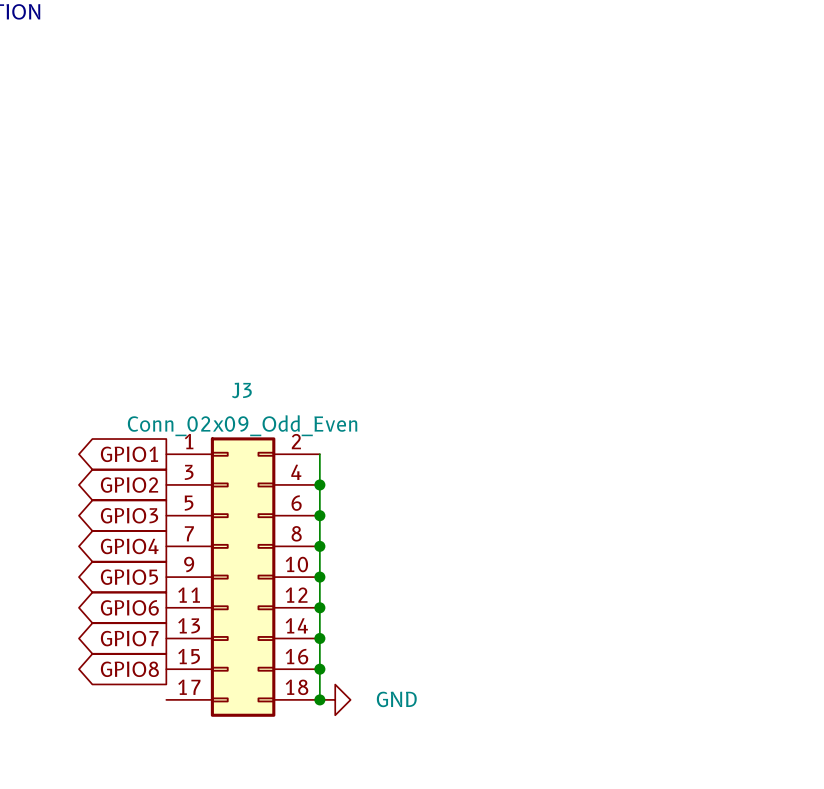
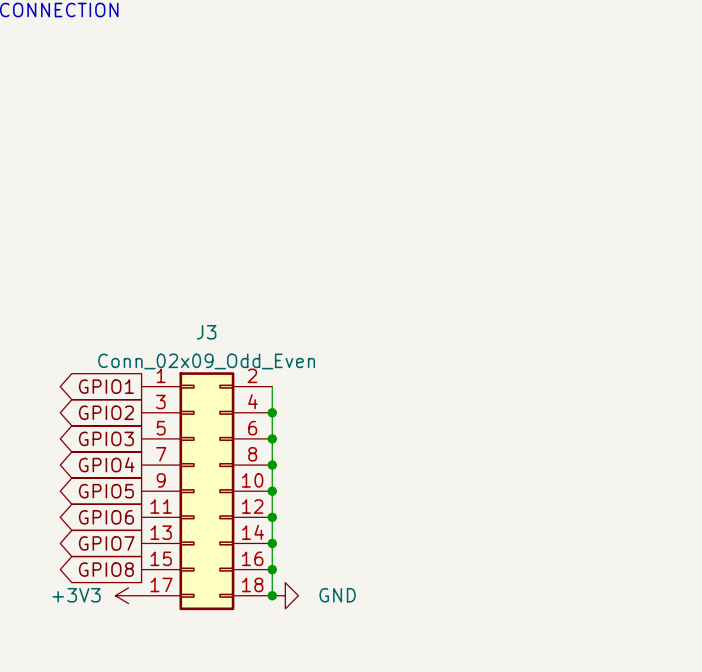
power symbol: none -> +3V3 (128, 595)

